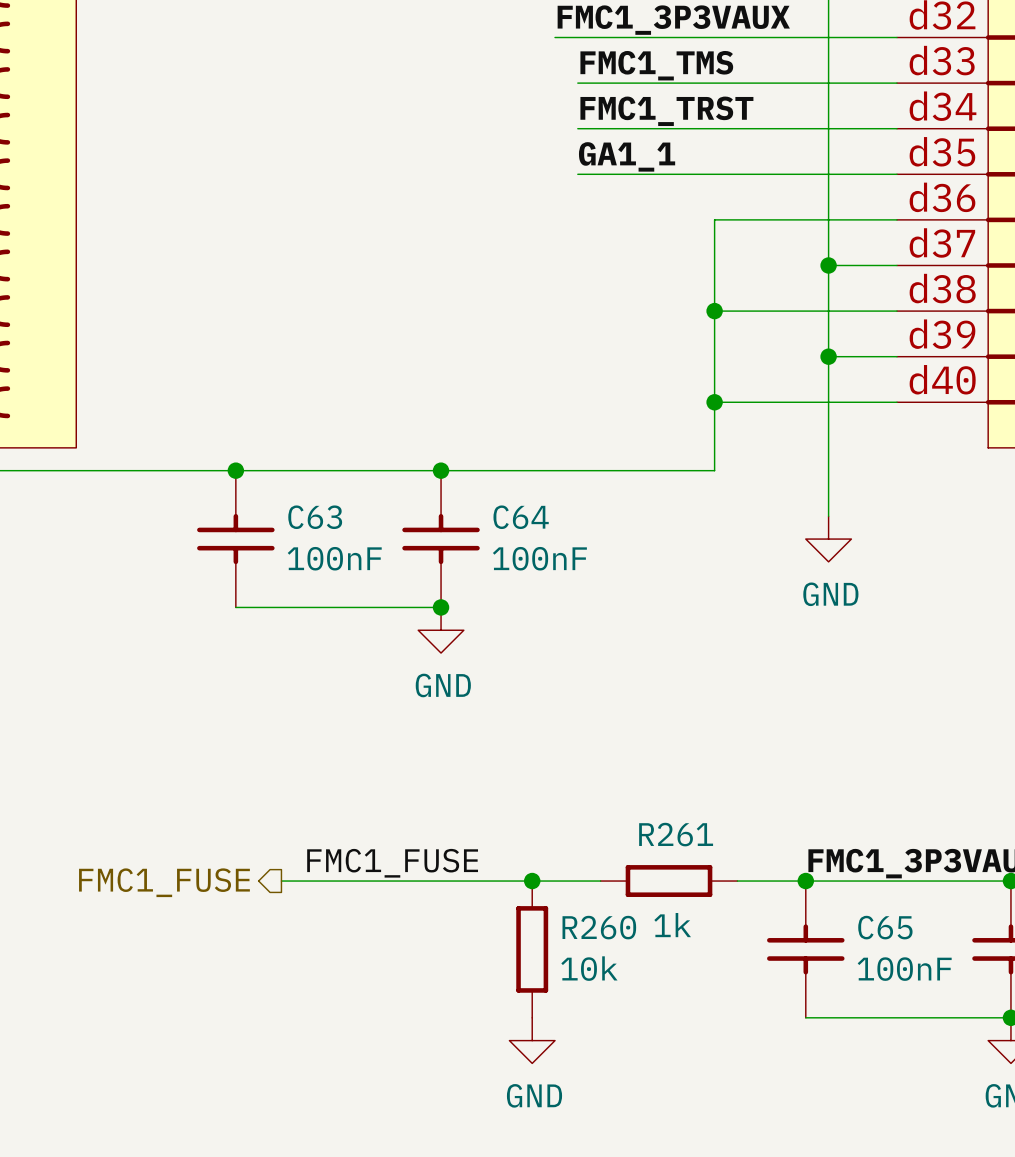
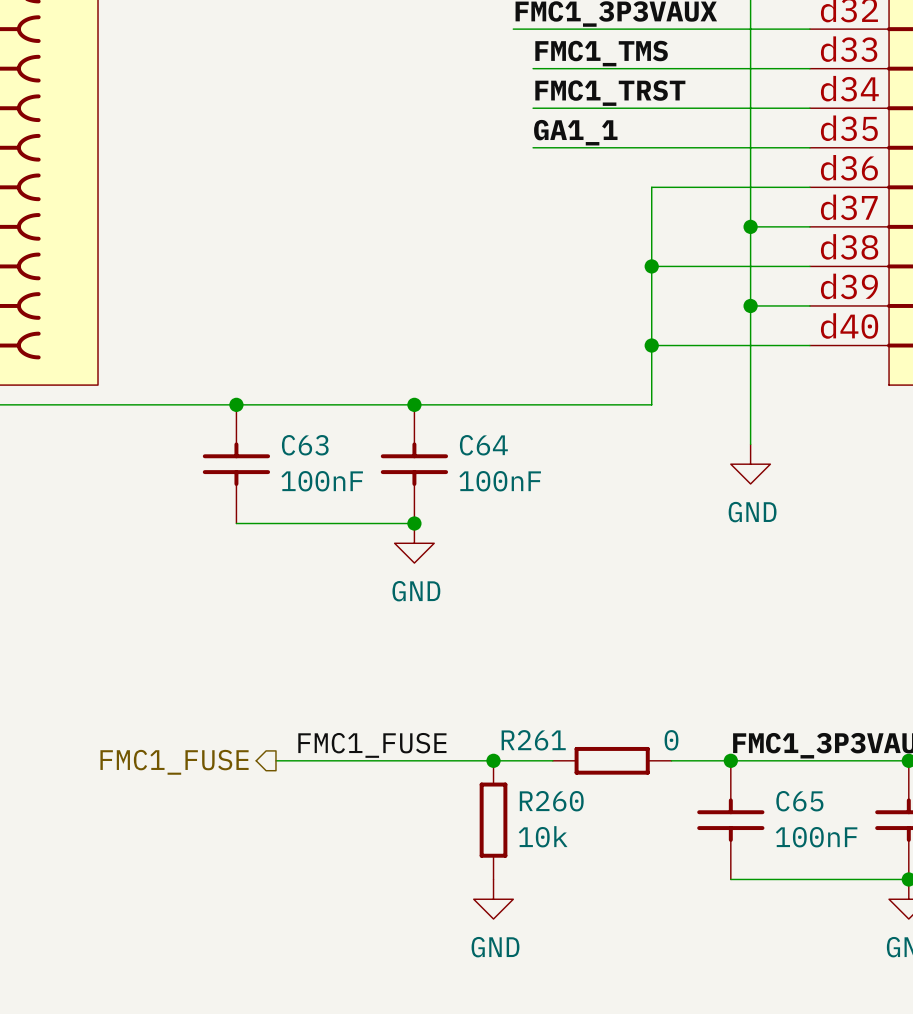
R261 name position: R261 (676, 834) -> R261 (533, 740)
R261 text: 1k (672, 925) -> 0 (671, 740)

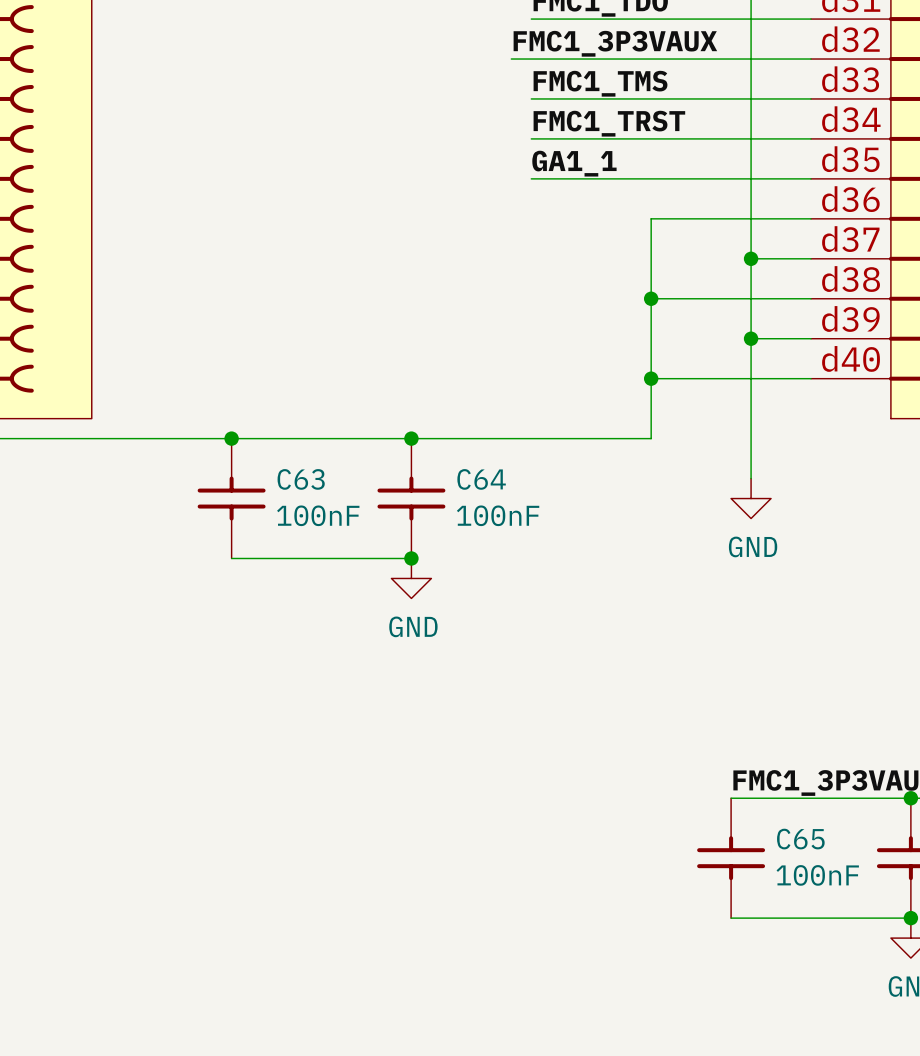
label: FMC1_FUSE (372, 745) -> none
wire: (275, 760) (552, 760) -> none
junction: (493, 760) -> none
R261: (612, 760) -> none
wire: (671, 760) (730, 760) -> none
junction: (730, 760) -> none
hierarchical label: FMC1_FUSE (174, 762) -> none
R260: (493, 820) -> none
power symbol: GND (493, 899) -> none

